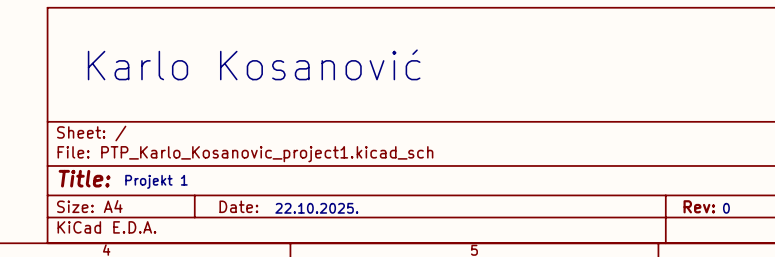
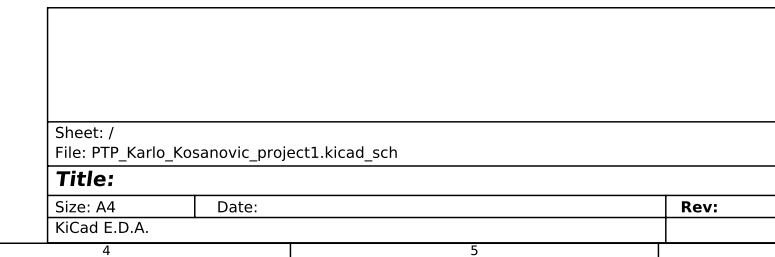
text: Karlo Kosanović (254, 64) -> none
text: Projekt 1 (156, 181) -> none
text: 22.10.2025. (316, 208) -> none
text: 0 (726, 208) -> none

